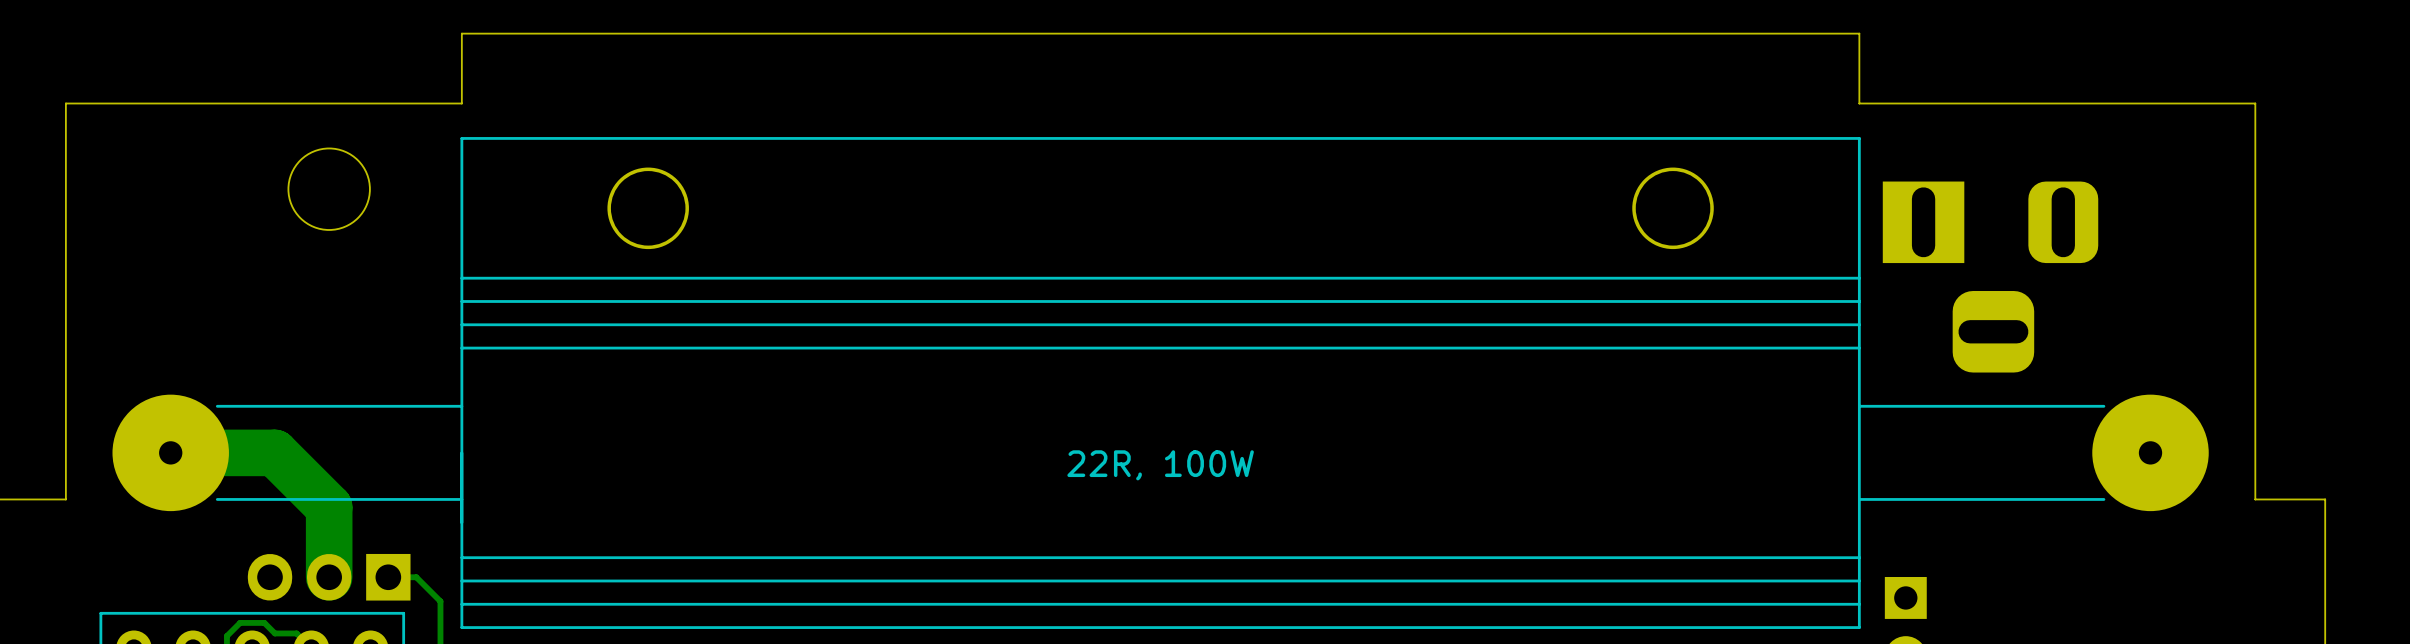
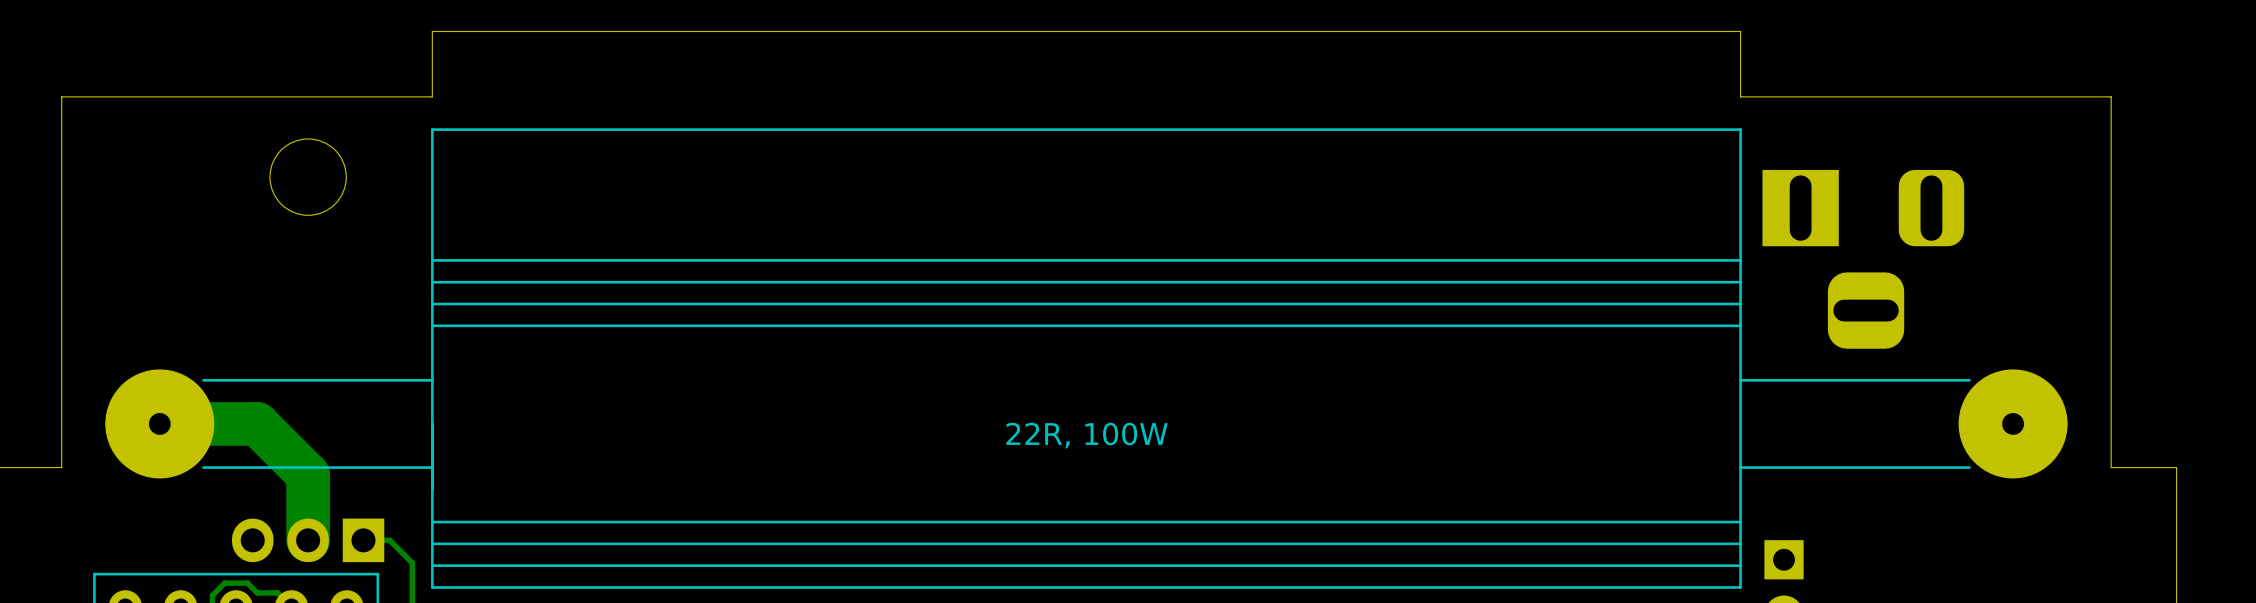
part footprint: [112, 137, 2209, 629] -> [105, 128, 2068, 589]

